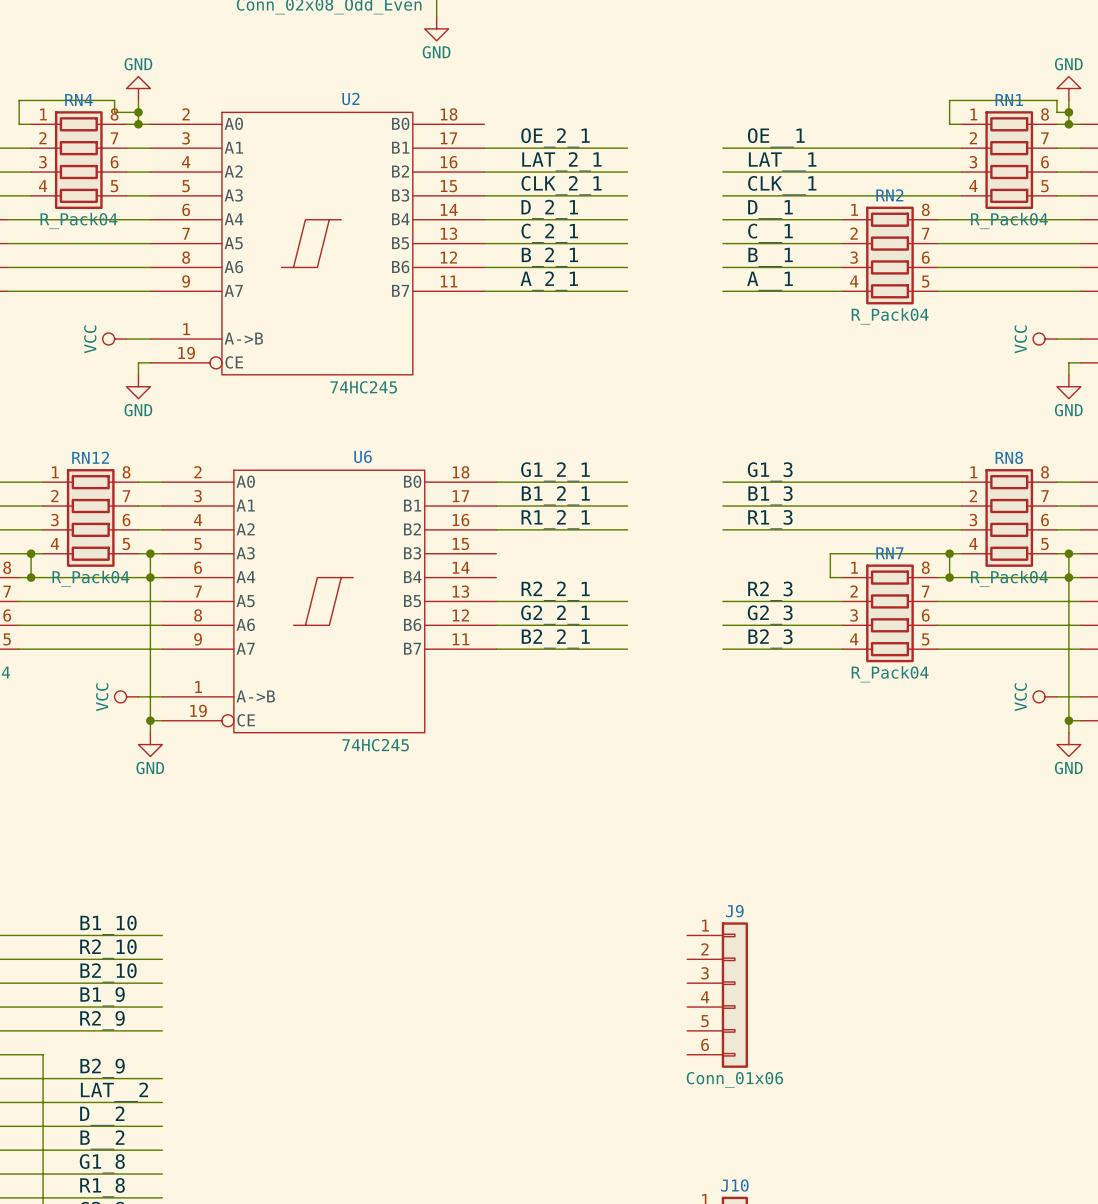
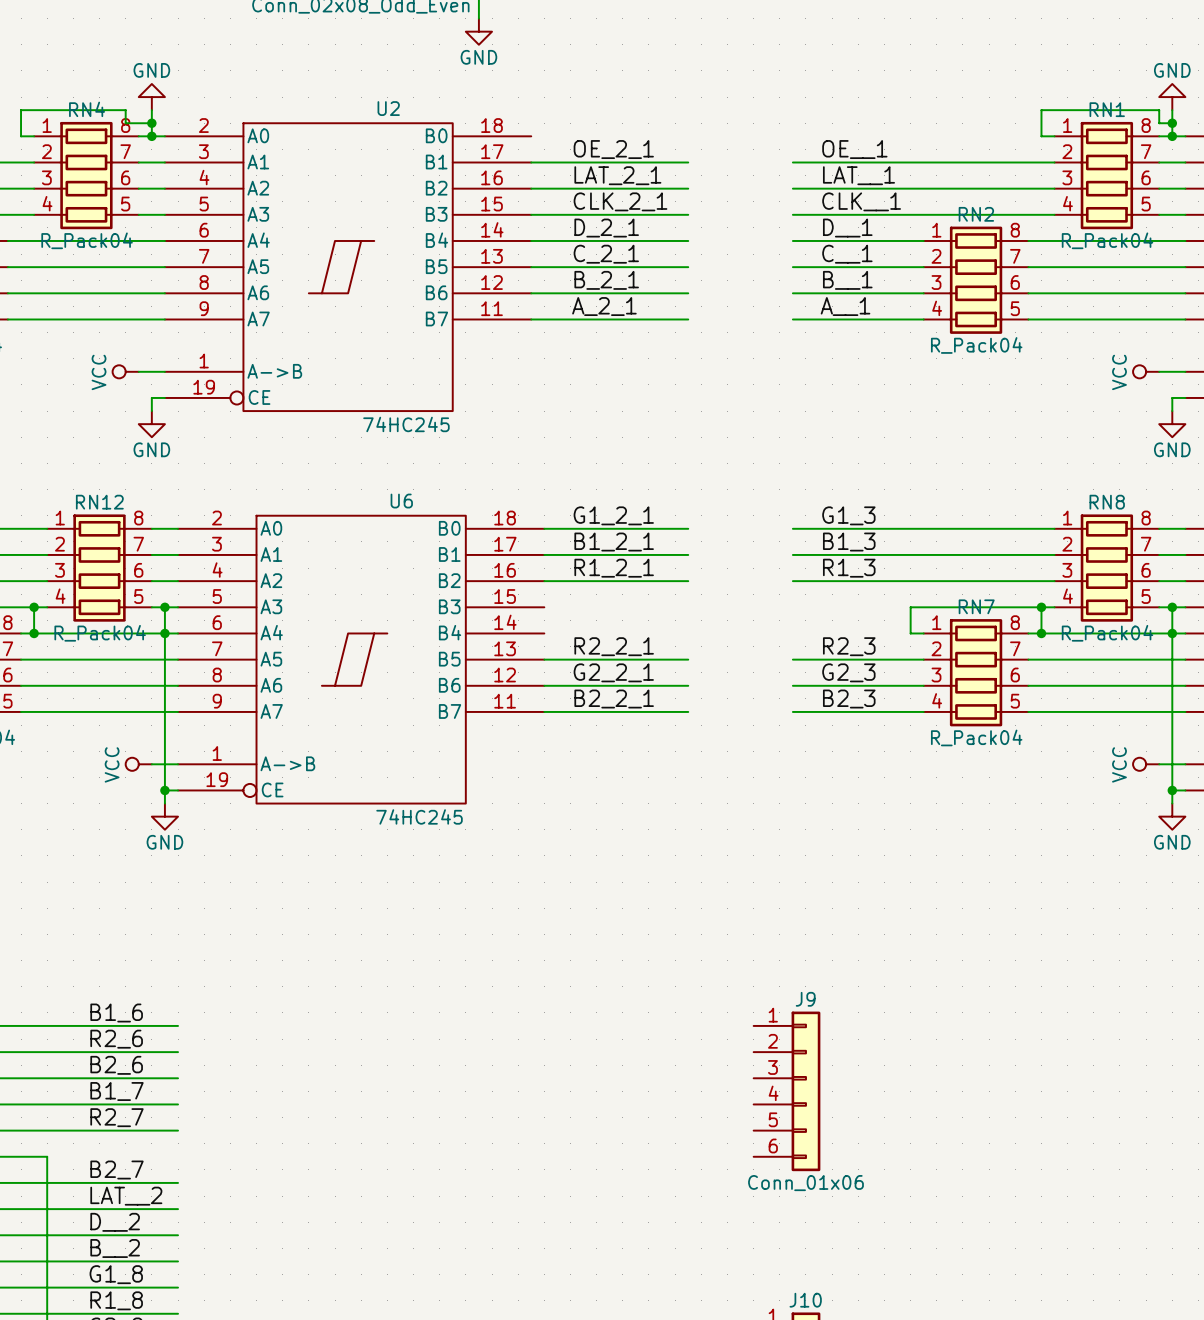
label: B1_10 (108, 925) -> B1_6 (116, 1013)
label: R2_10 (108, 949) -> R2_6 (116, 1039)
label: B2_10 (108, 972) -> B2_6 (116, 1065)
label: B1_9 (102, 996) -> B1_7 (117, 1091)
label: R2_9 (102, 1020) -> R2_7 (117, 1117)
label: B2_9 (102, 1068) -> B2_7 (117, 1169)

